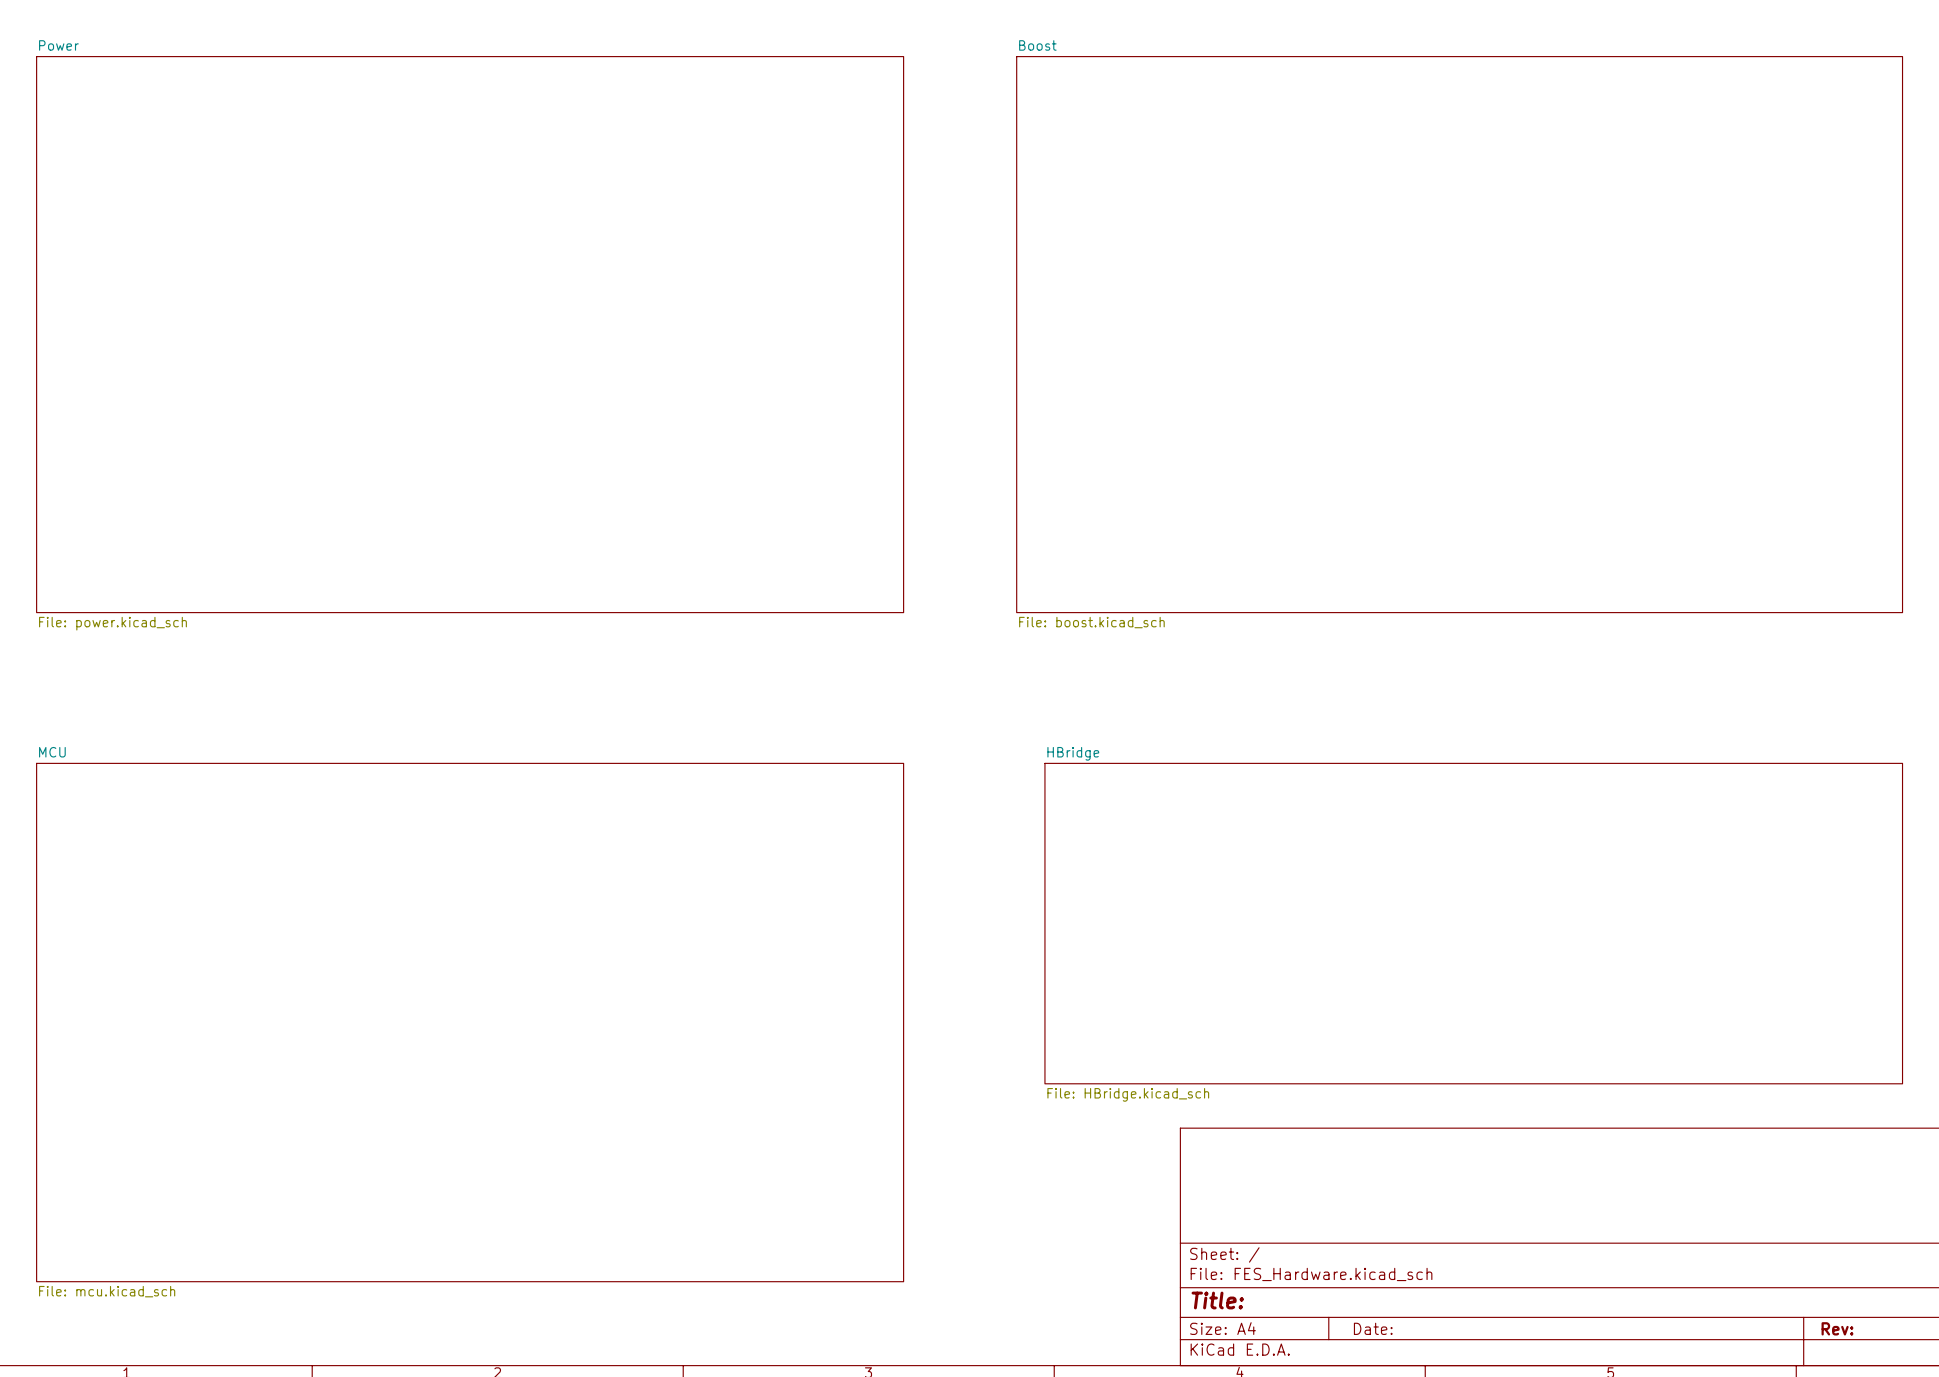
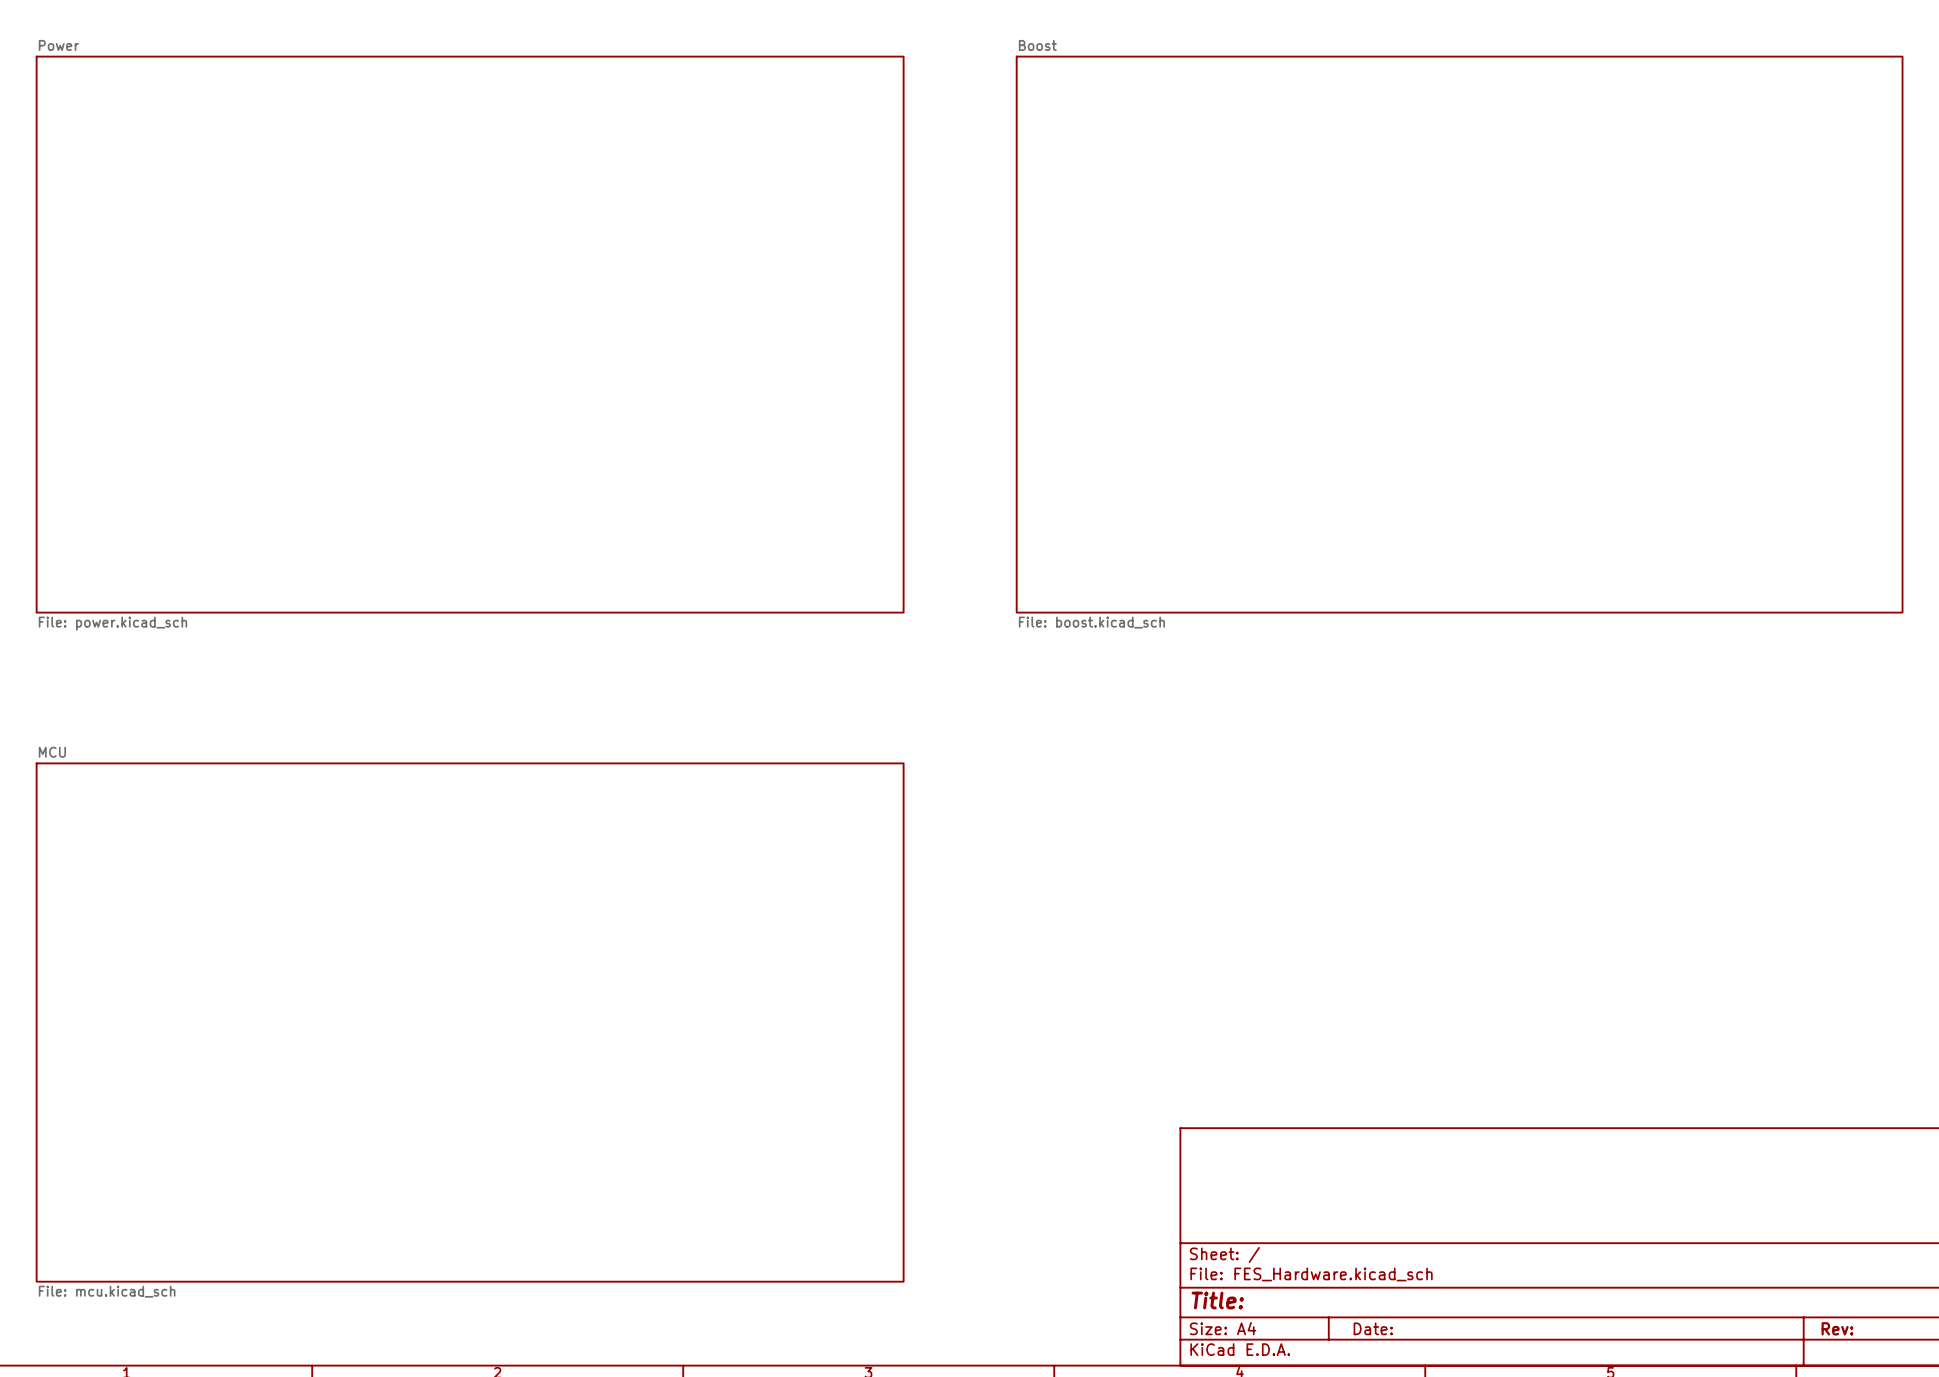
sheet HBridge: File: HBridge.kicad_sch (1473, 923) -> none

